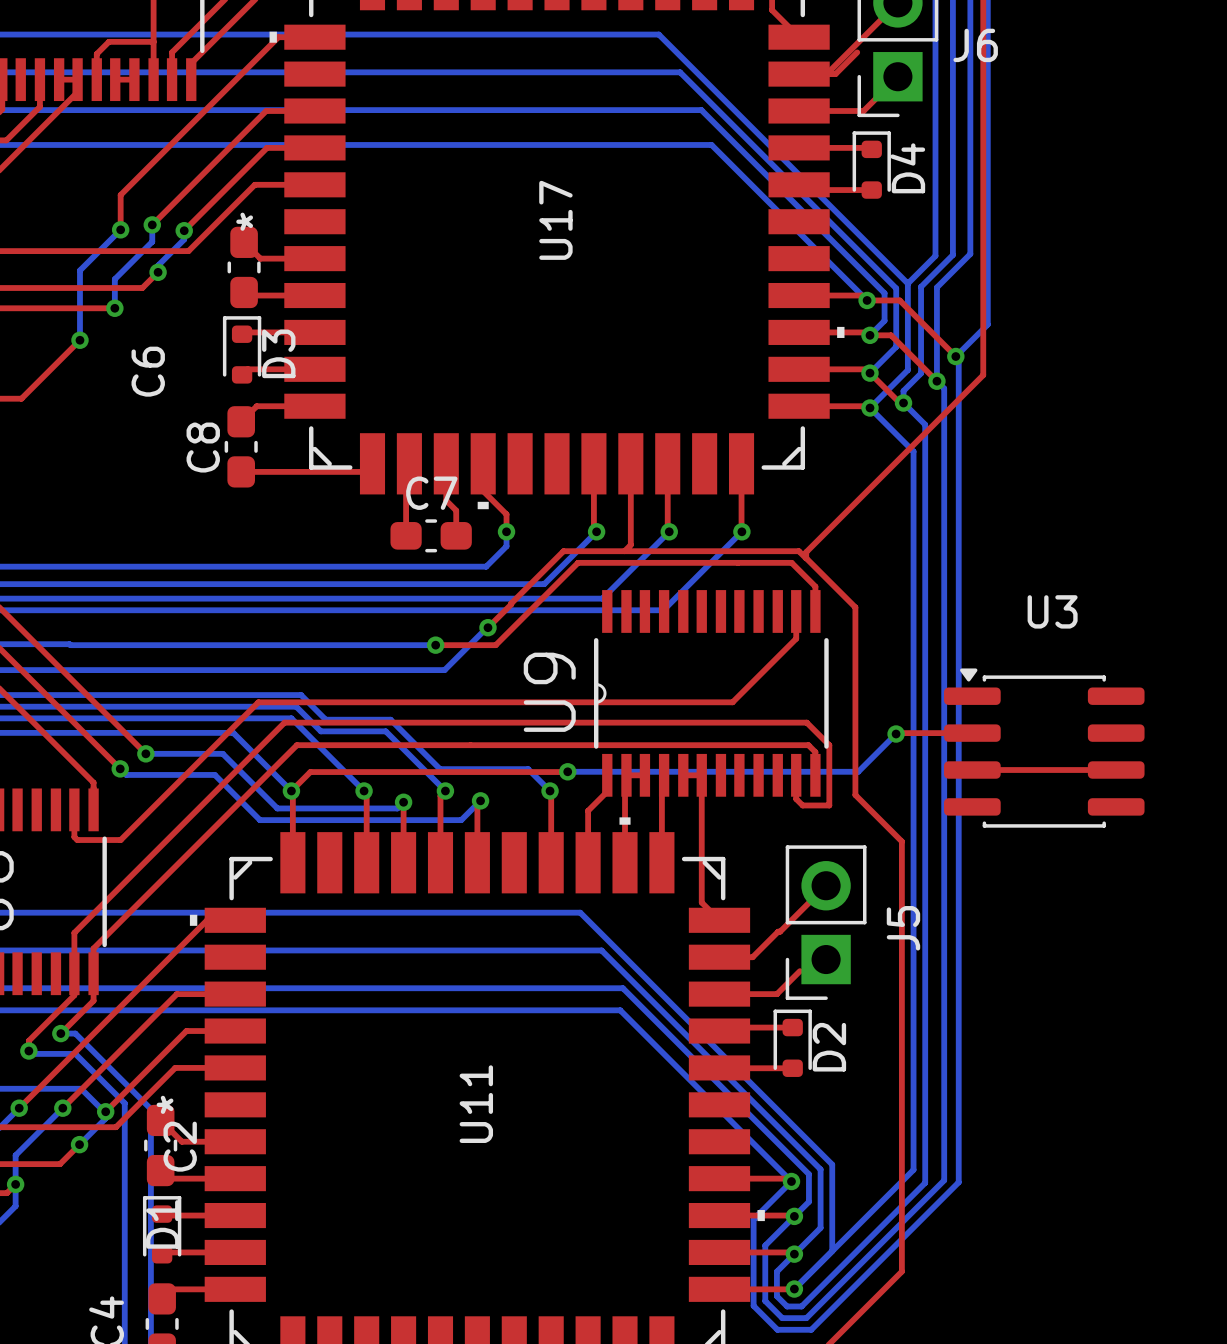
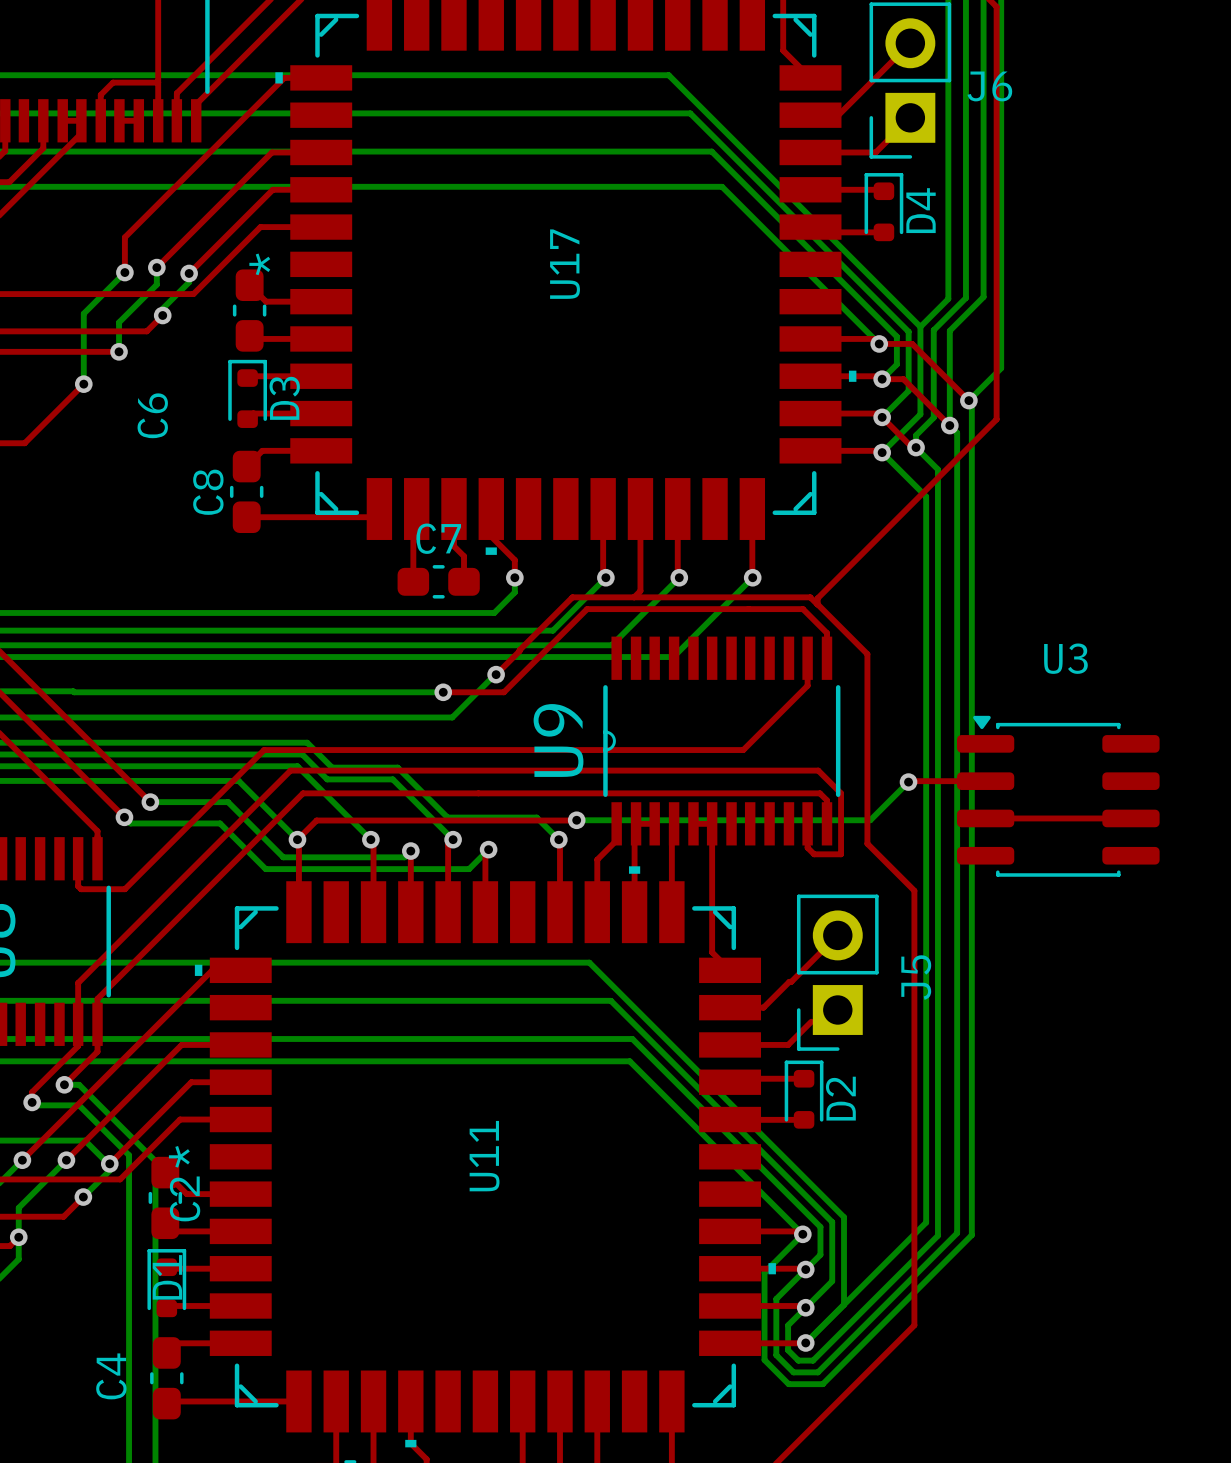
top track: (857, 52) (835, 74) (826, 74) -> none

